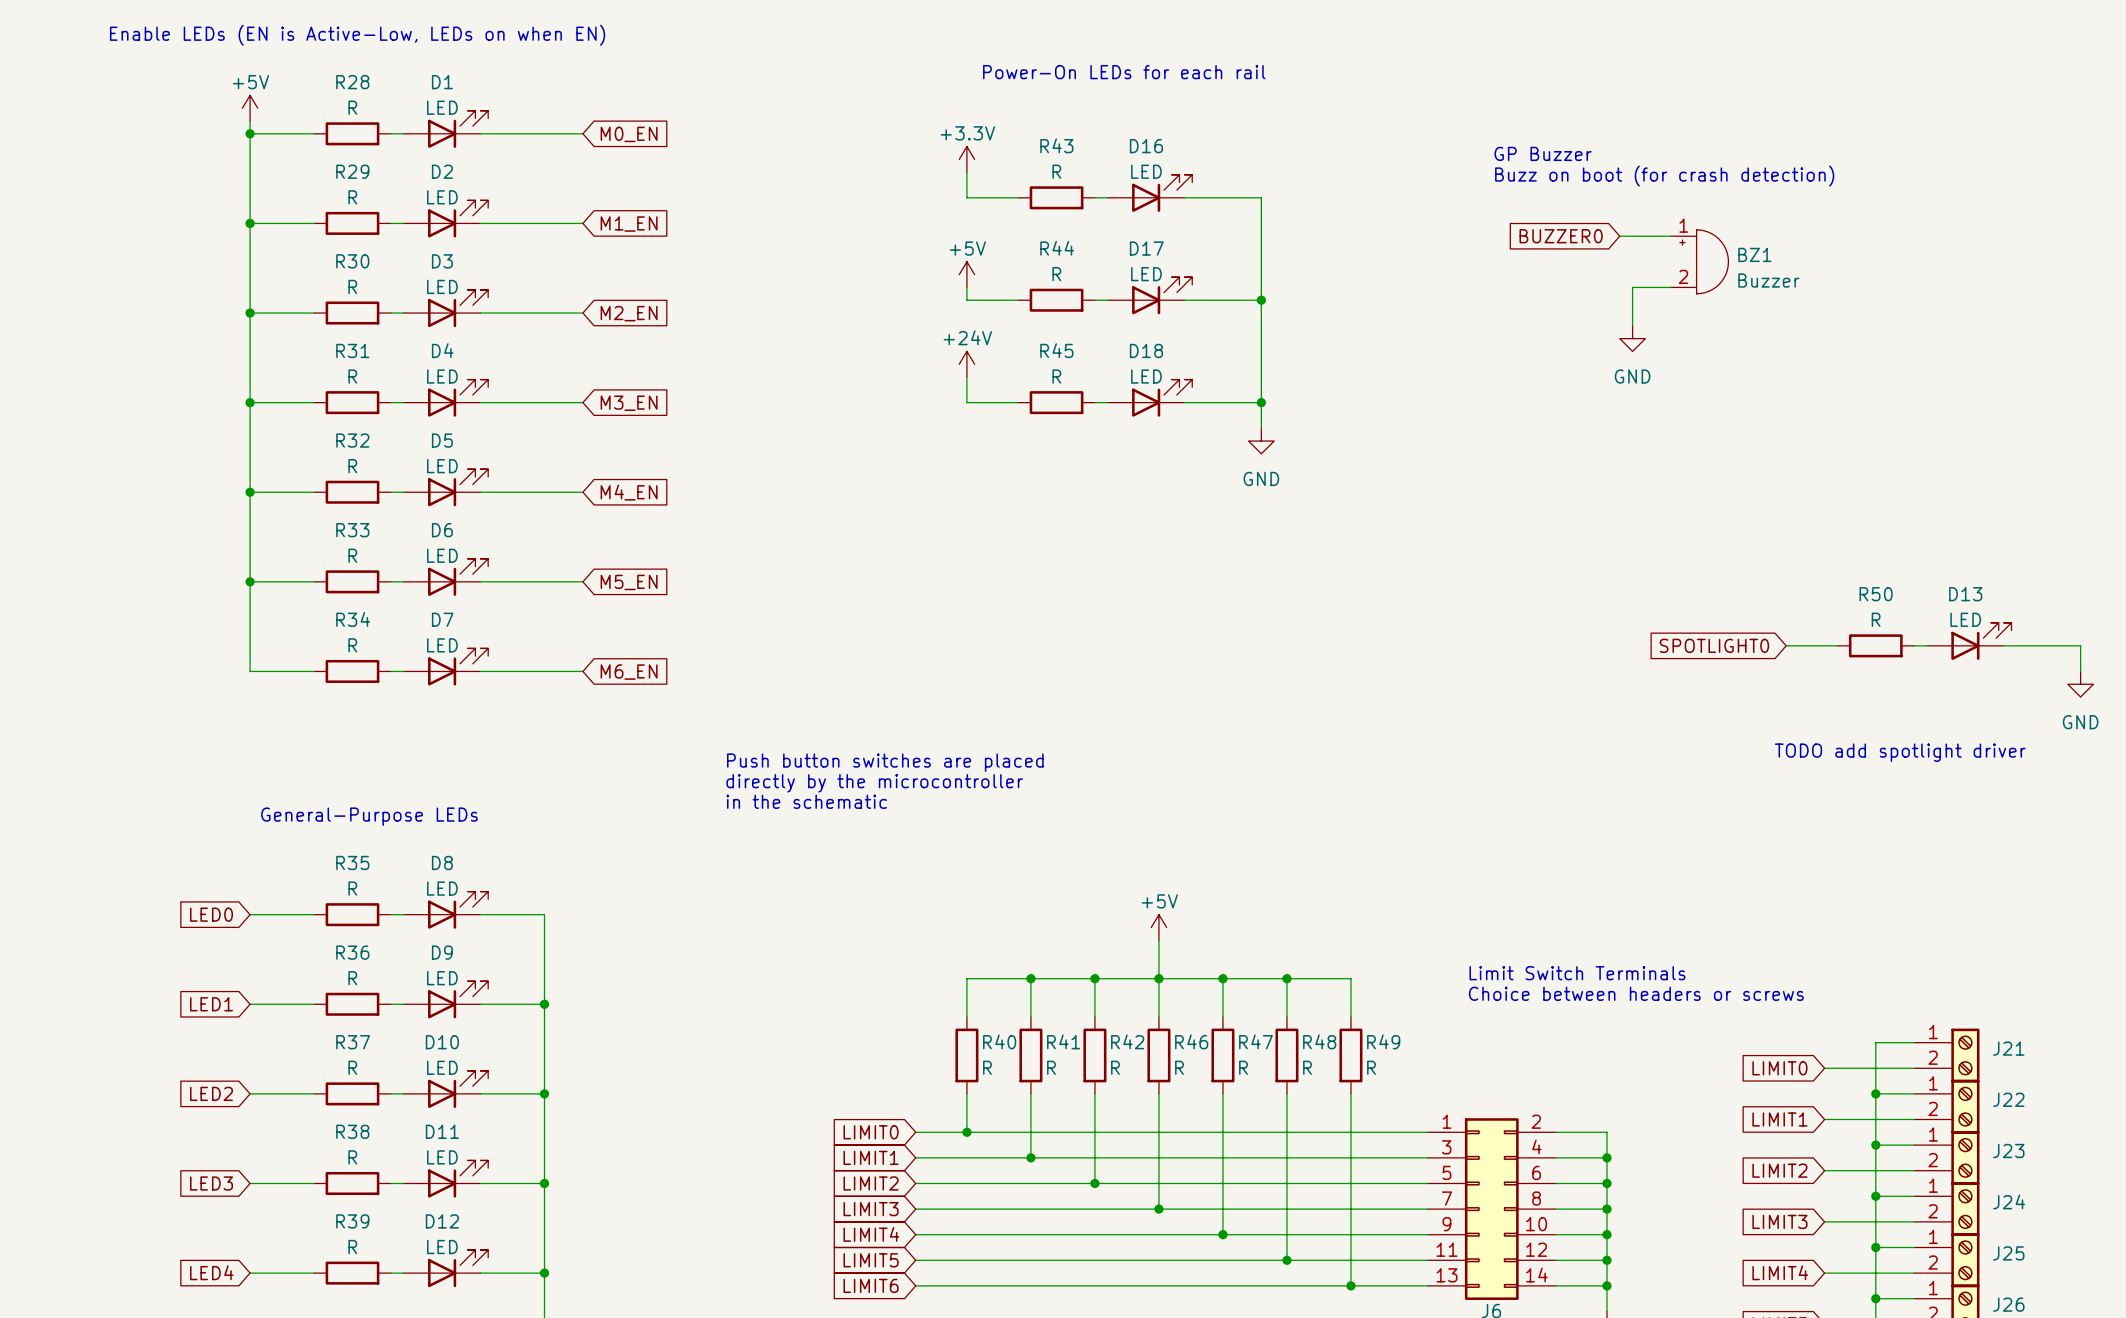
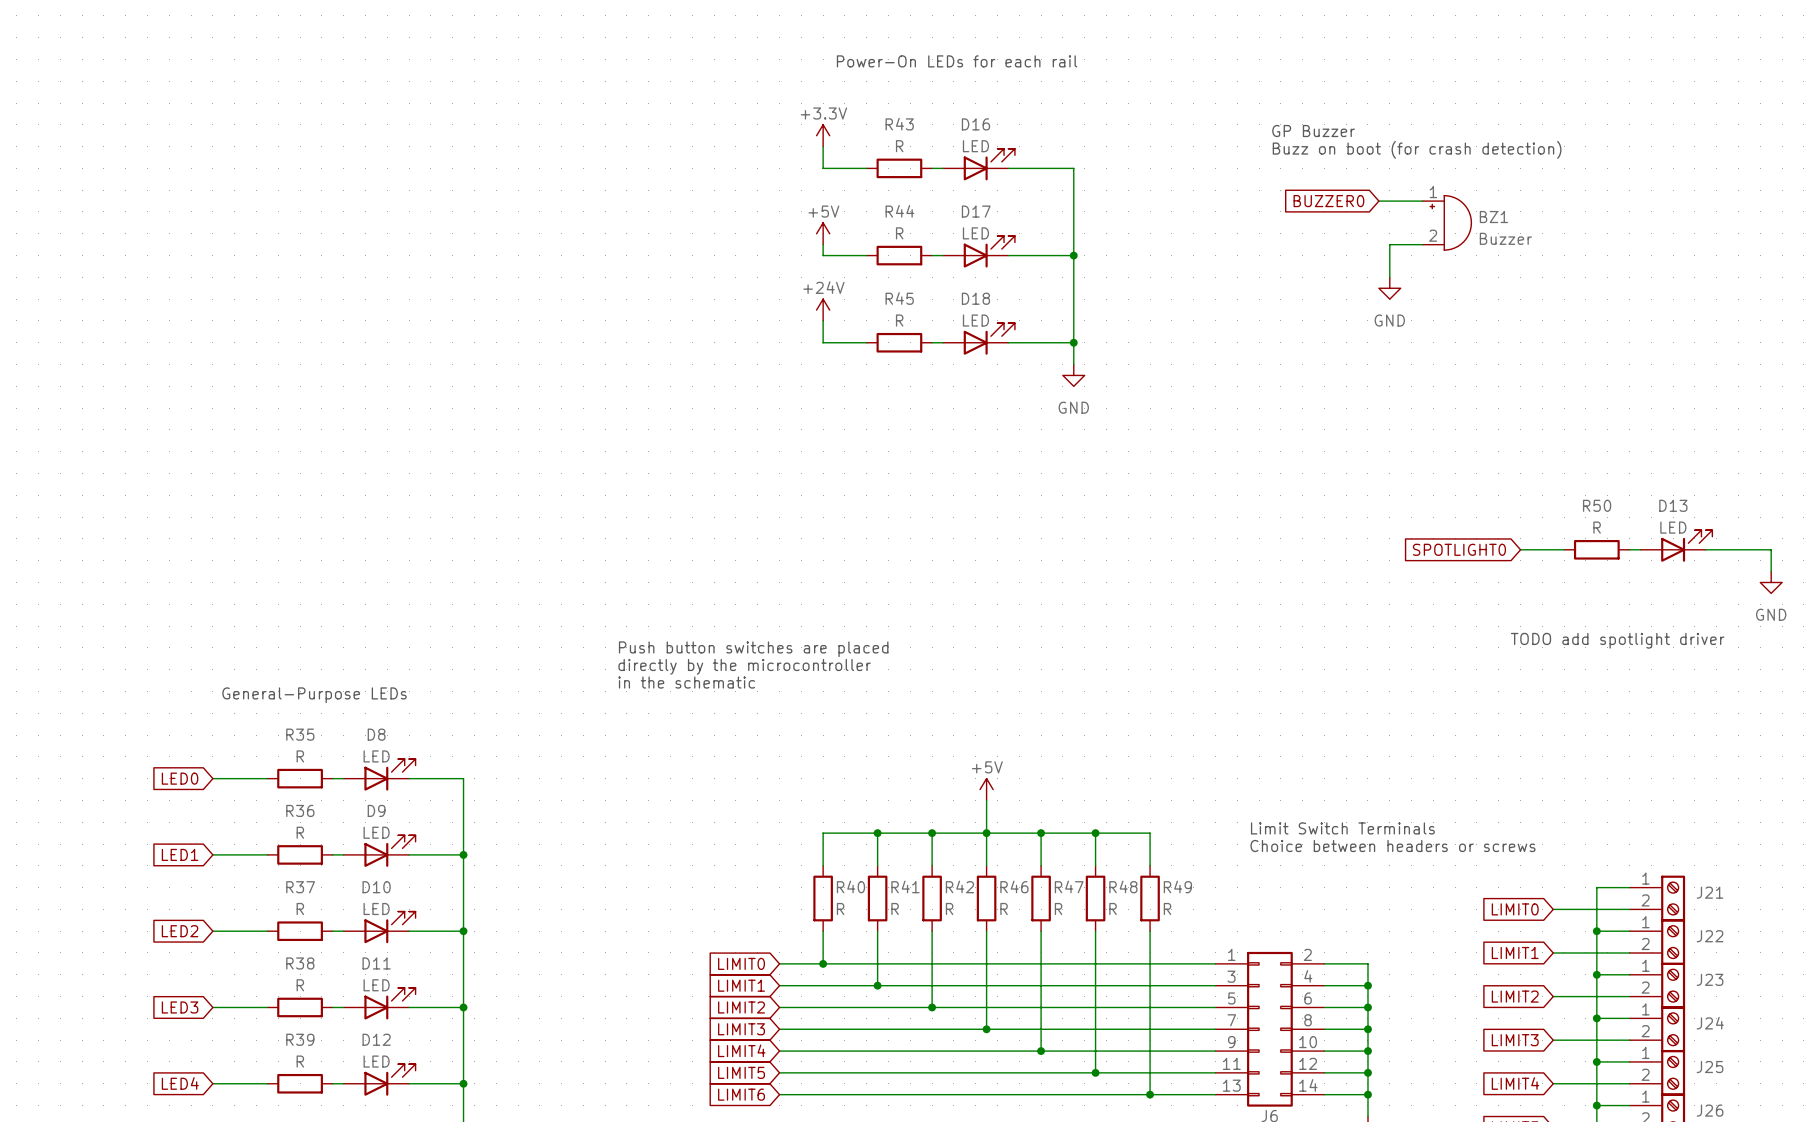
text: Enable LEDs (EN is Active-Low, LEDs on when EN) (357, 35) -> none
power symbol: +5V (250, 108) -> none
wire: (250, 121) (250, 671) (314, 671) -> none
D1: LED (445, 129) -> none
wire: (250, 133) (314, 133) -> none
junction: (250, 133) -> none
R28: R (352, 133) -> none
wire: (390, 133) (403, 133) -> none
wire: (480, 133) (582, 133) -> none
global label: M0_EN (629, 134) -> none
D2: LED (445, 218) -> none
wire: (250, 223) (314, 223) -> none
junction: (250, 223) -> none
R29: R (352, 223) -> none
wire: (390, 223) (403, 223) -> none
wire: (480, 223) (582, 223) -> none
global label: M1_EN (629, 224) -> none
D3: LED (445, 308) -> none
wire: (250, 313) (314, 313) -> none
junction: (250, 313) -> none
R30: R (352, 313) -> none
wire: (390, 313) (403, 313) -> none
wire: (480, 313) (582, 313) -> none
global label: M2_EN (629, 313) -> none
D4: LED (445, 398) -> none
wire: (250, 402) (314, 402) -> none
junction: (250, 402) -> none
R31: R (352, 402) -> none
wire: (390, 402) (403, 402) -> none
wire: (480, 402) (582, 402) -> none
global label: M3_EN (629, 403) -> none
D5: LED (445, 487) -> none
wire: (250, 492) (314, 492) -> none
junction: (250, 492) -> none
R32: R (352, 492) -> none
wire: (390, 492) (403, 492) -> none
wire: (480, 492) (582, 492) -> none
global label: M4_EN (629, 492) -> none
D6: LED (445, 577) -> none
wire: (250, 581) (314, 581) -> none
junction: (250, 581) -> none
R33: R (352, 581) -> none
wire: (390, 581) (403, 581) -> none
wire: (480, 581) (582, 581) -> none
global label: M5_EN (629, 582) -> none
D7: LED (445, 666) -> none
R34: R (352, 671) -> none
wire: (390, 671) (403, 671) -> none
wire: (480, 671) (582, 671) -> none
global label: M6_EN (629, 672) -> none

